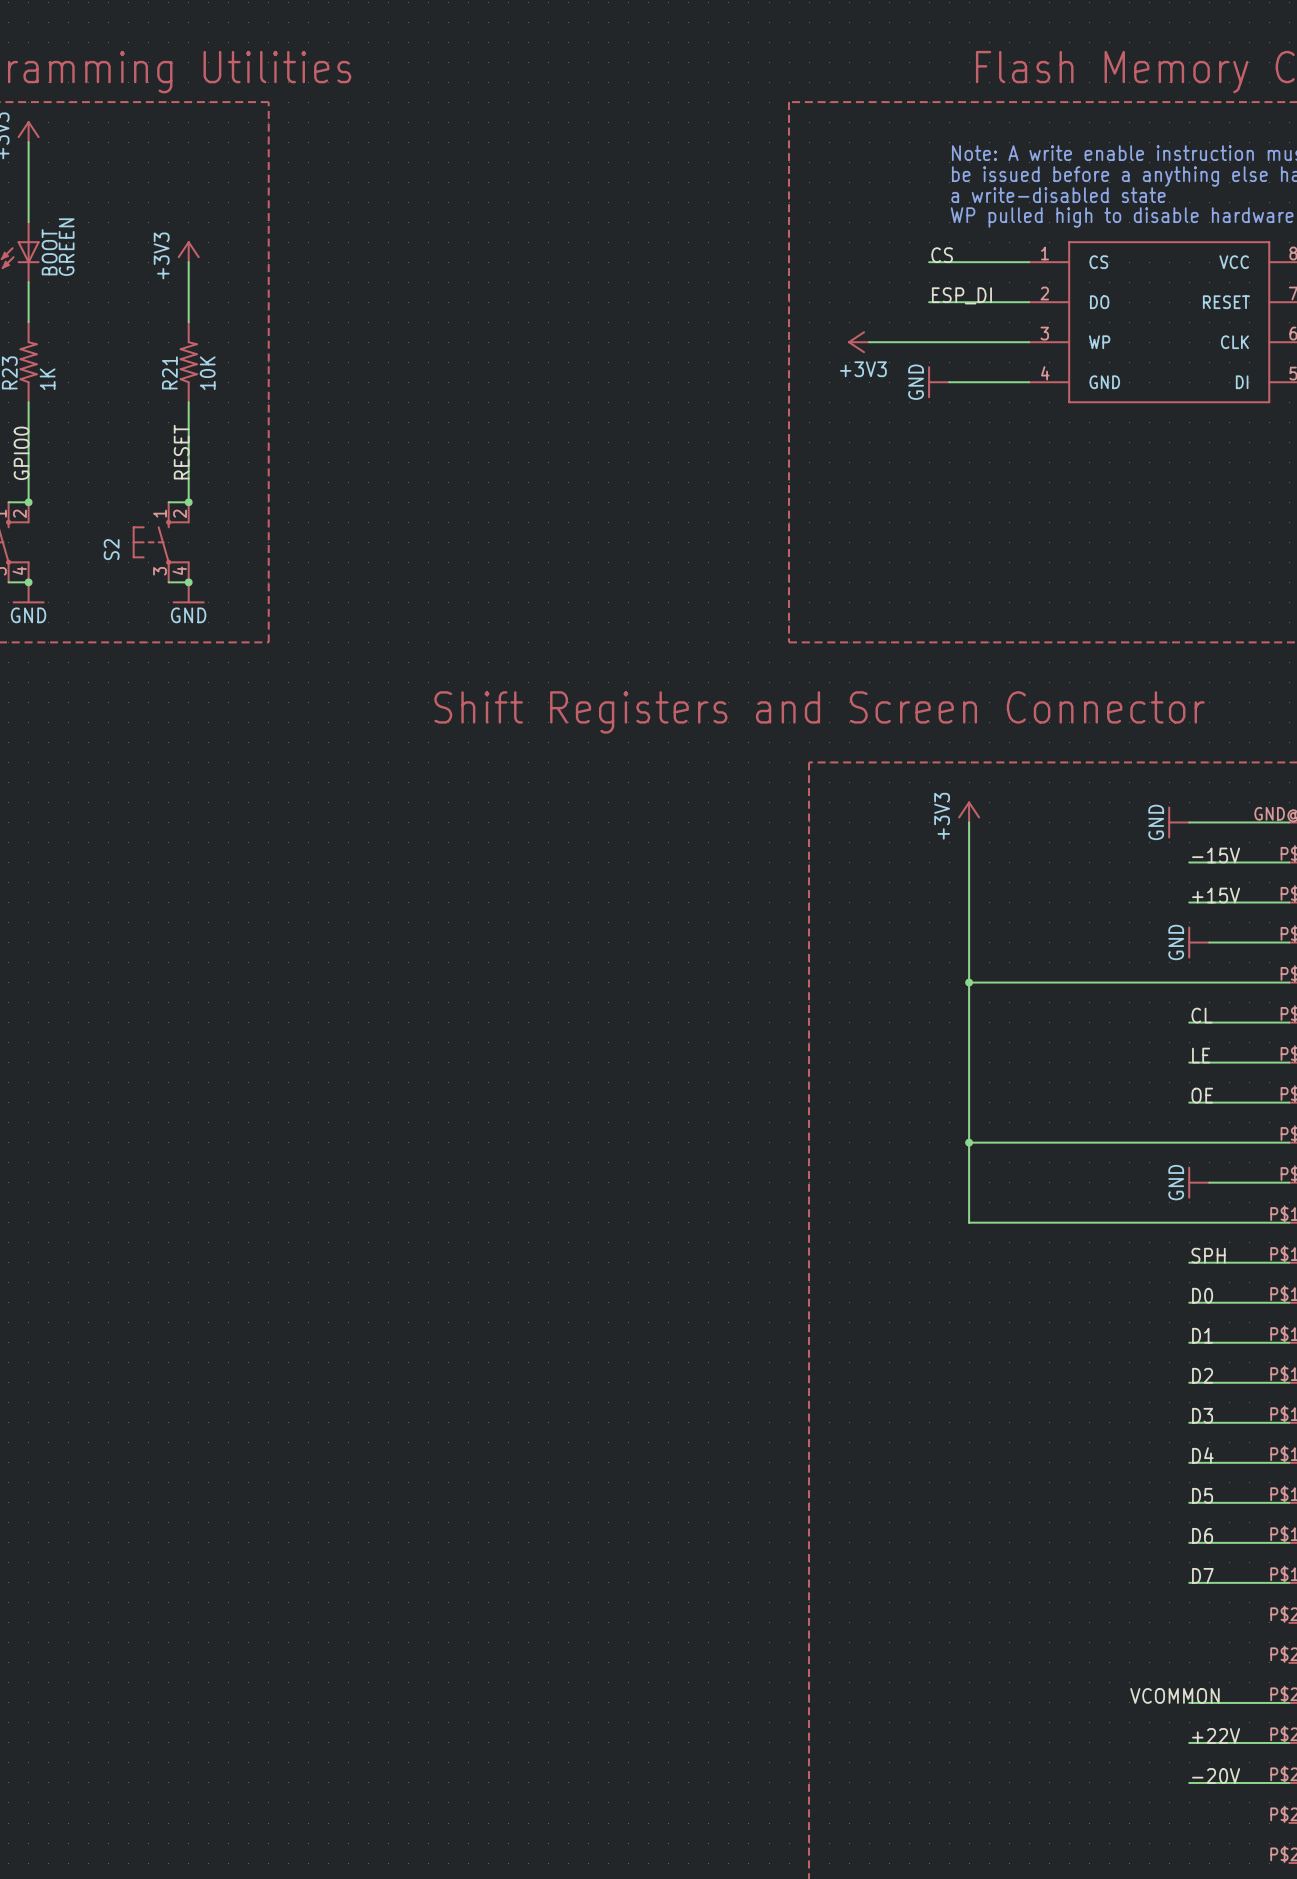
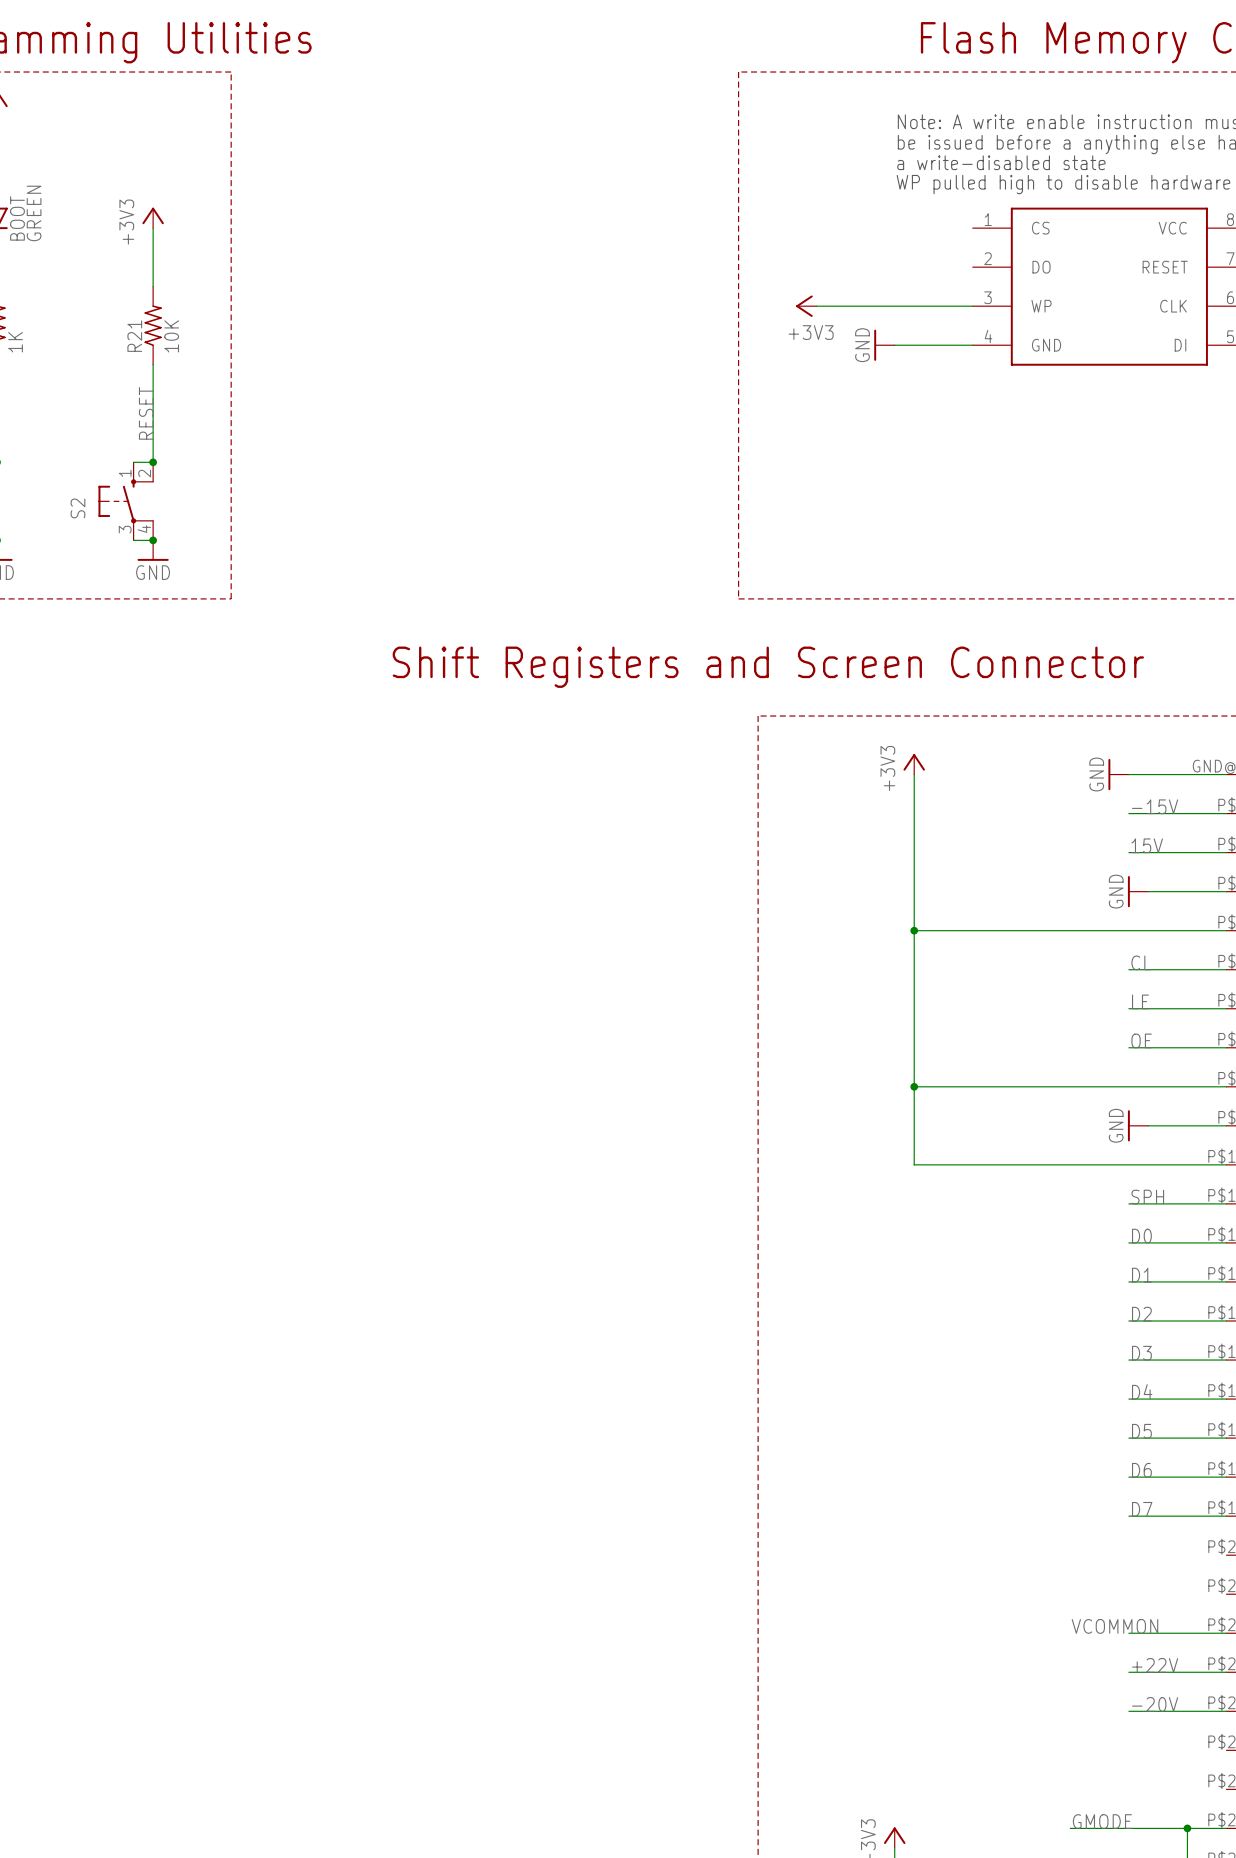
label: CS (942, 255) -> none
wire: (929, 262) (1029, 262) -> none
label: ESP_DI (961, 295) -> none
wire: (929, 302) (1029, 302) -> none
label: +15V (1216, 895) -> 15V (1147, 845)

